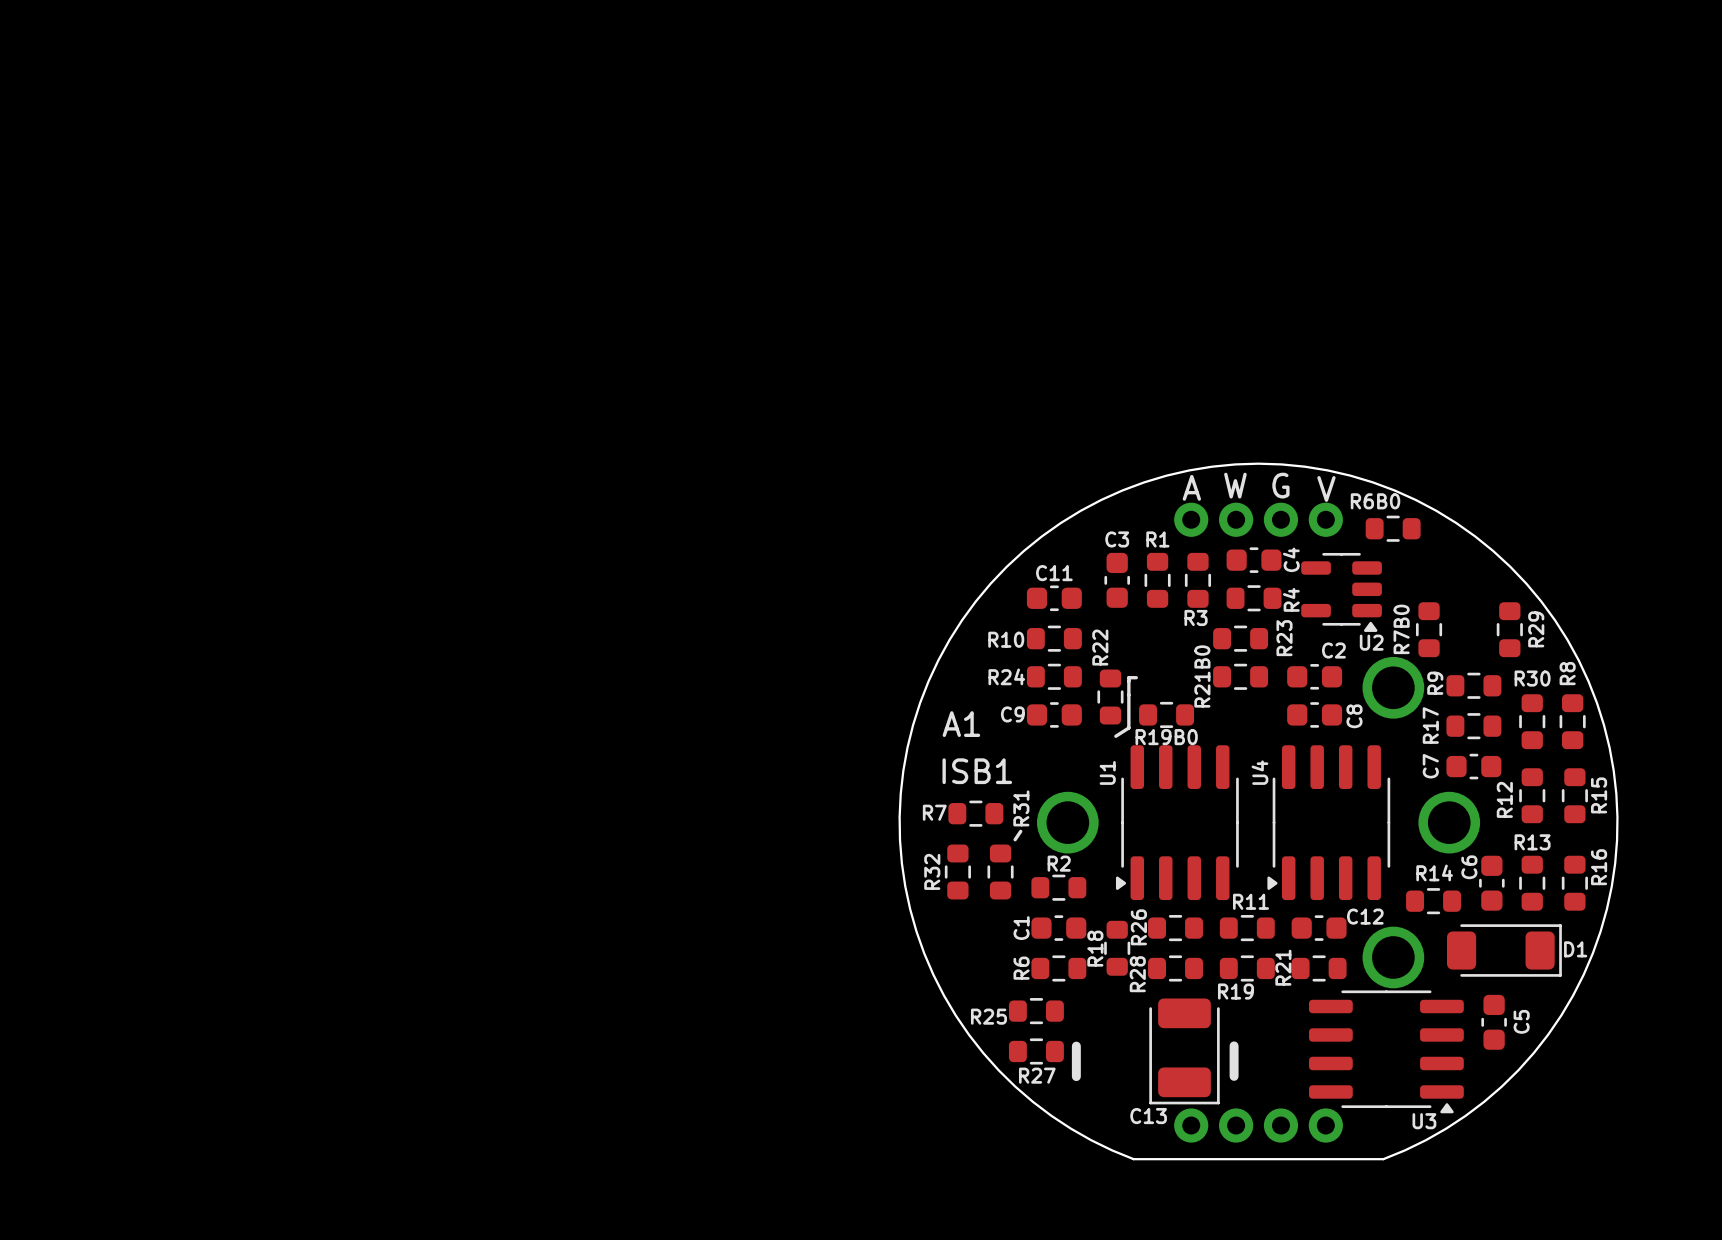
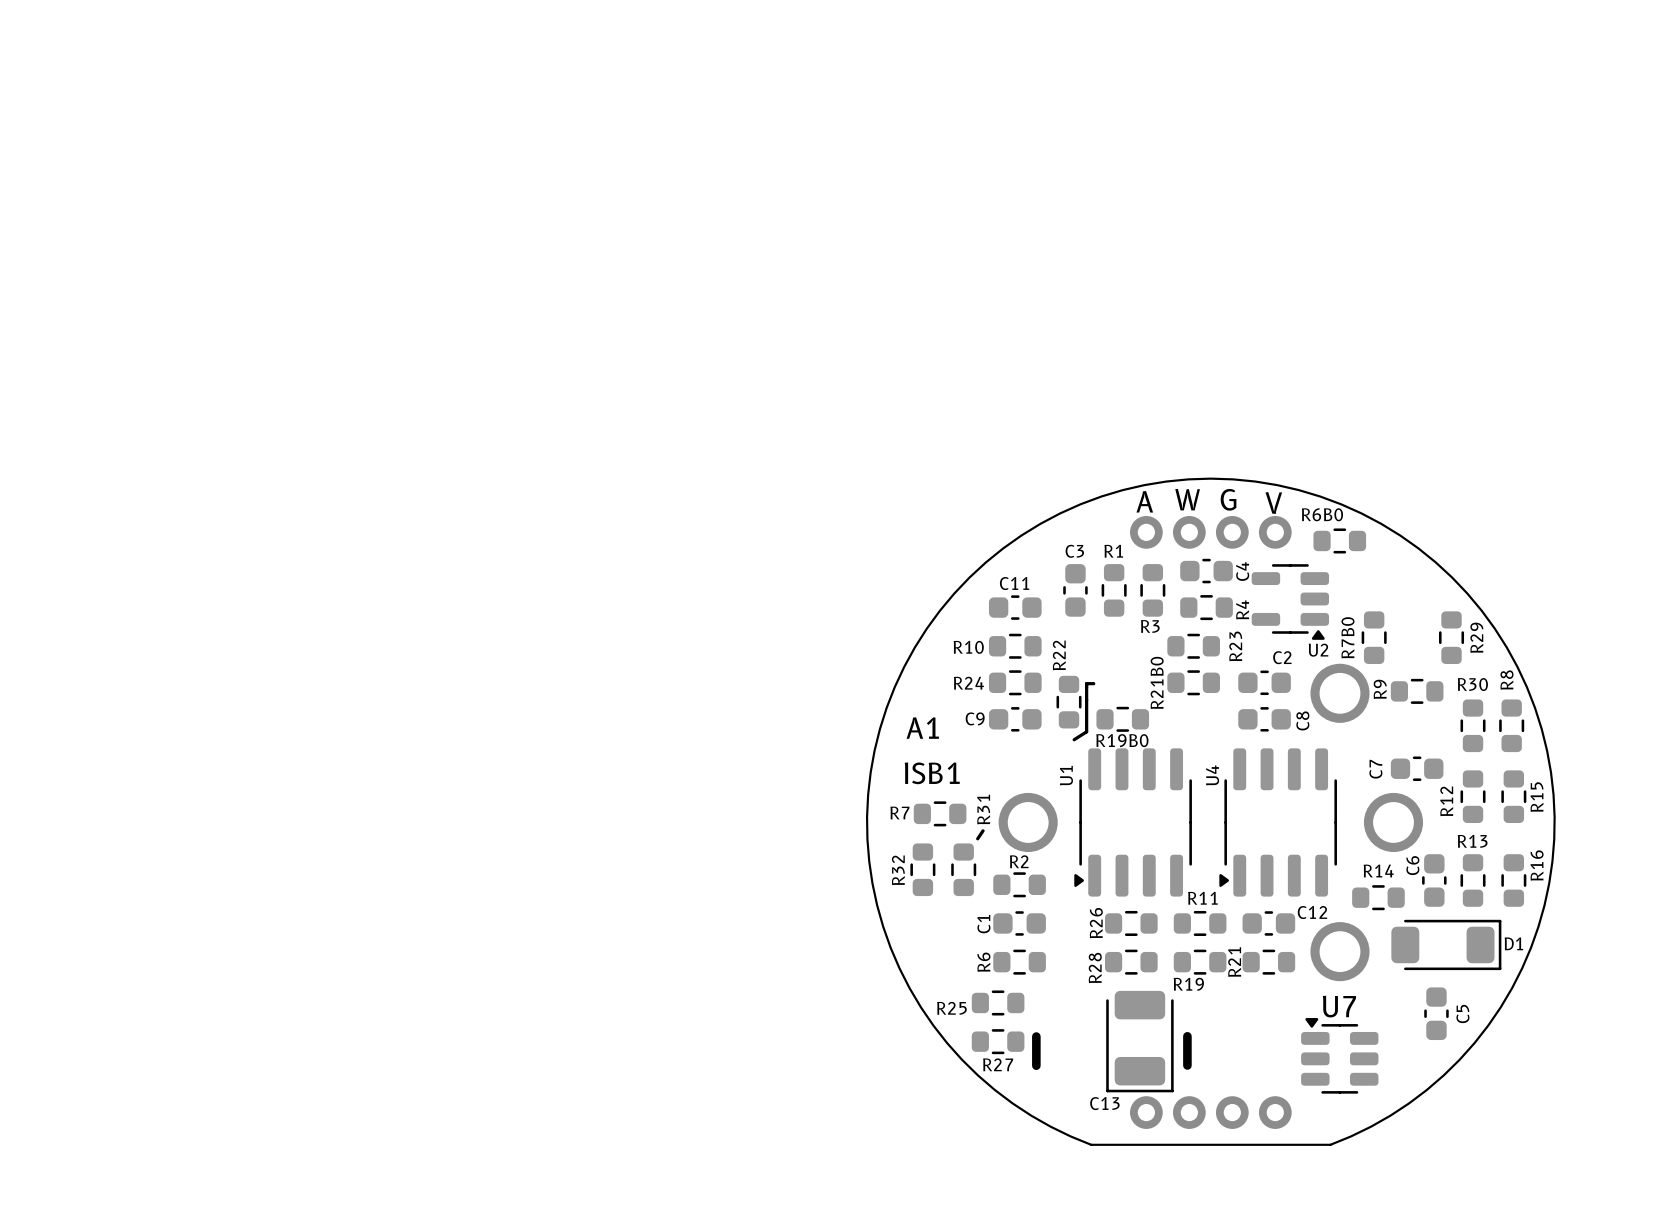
R17: (1473, 726) -> none
R18: (1117, 948) -> none
U3: (1386, 1051) -> none
U7: none -> (1339, 1055)

